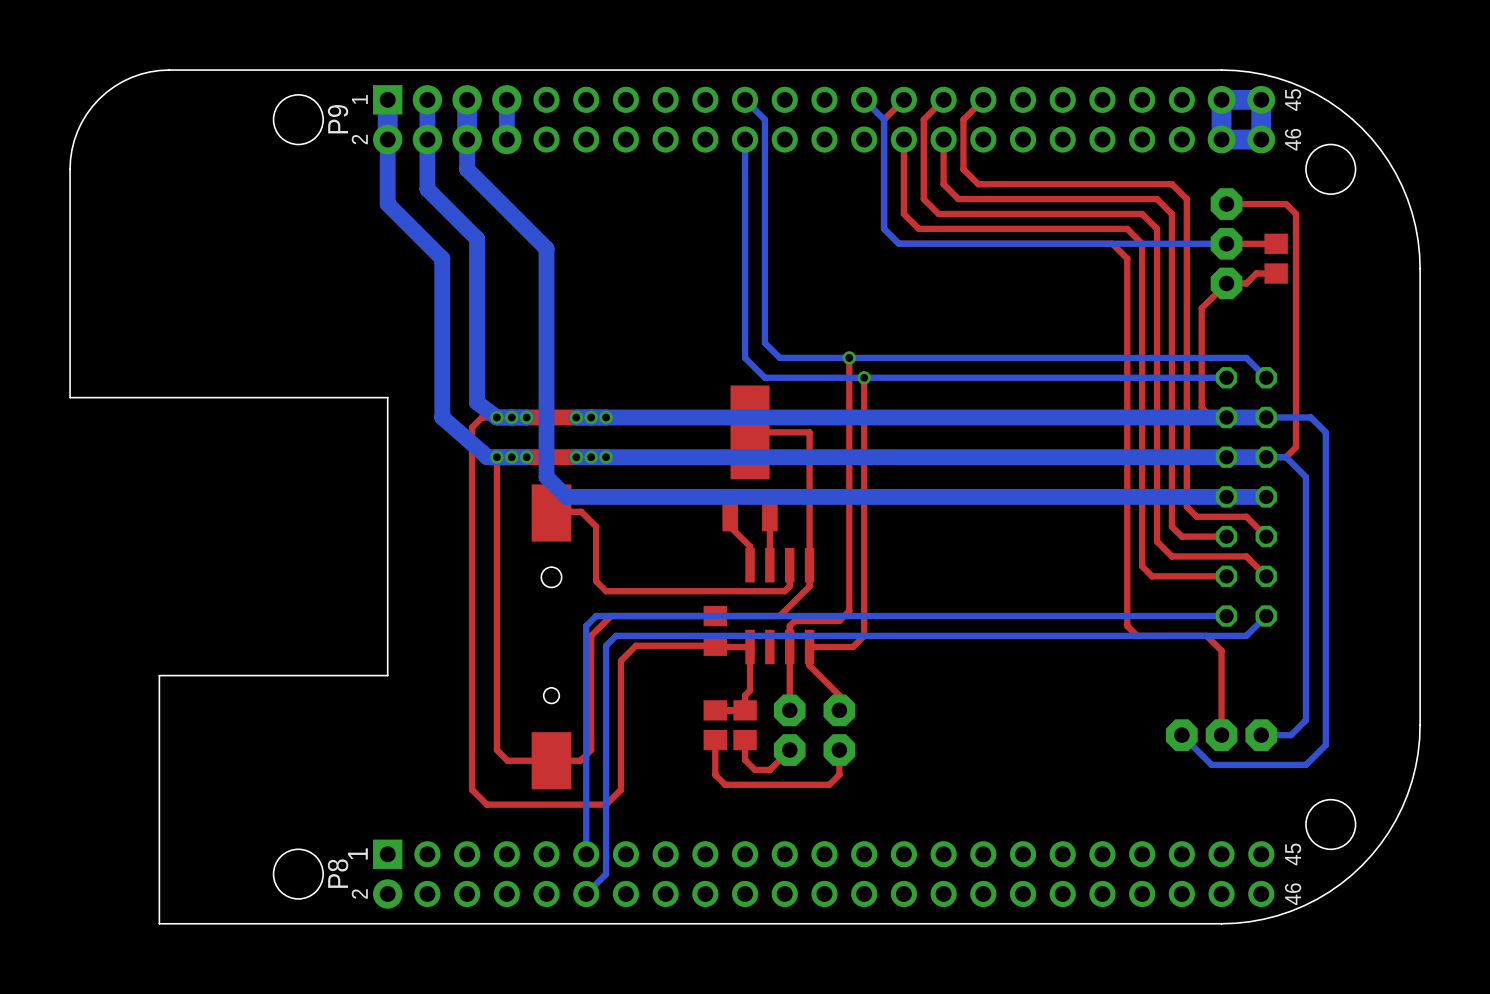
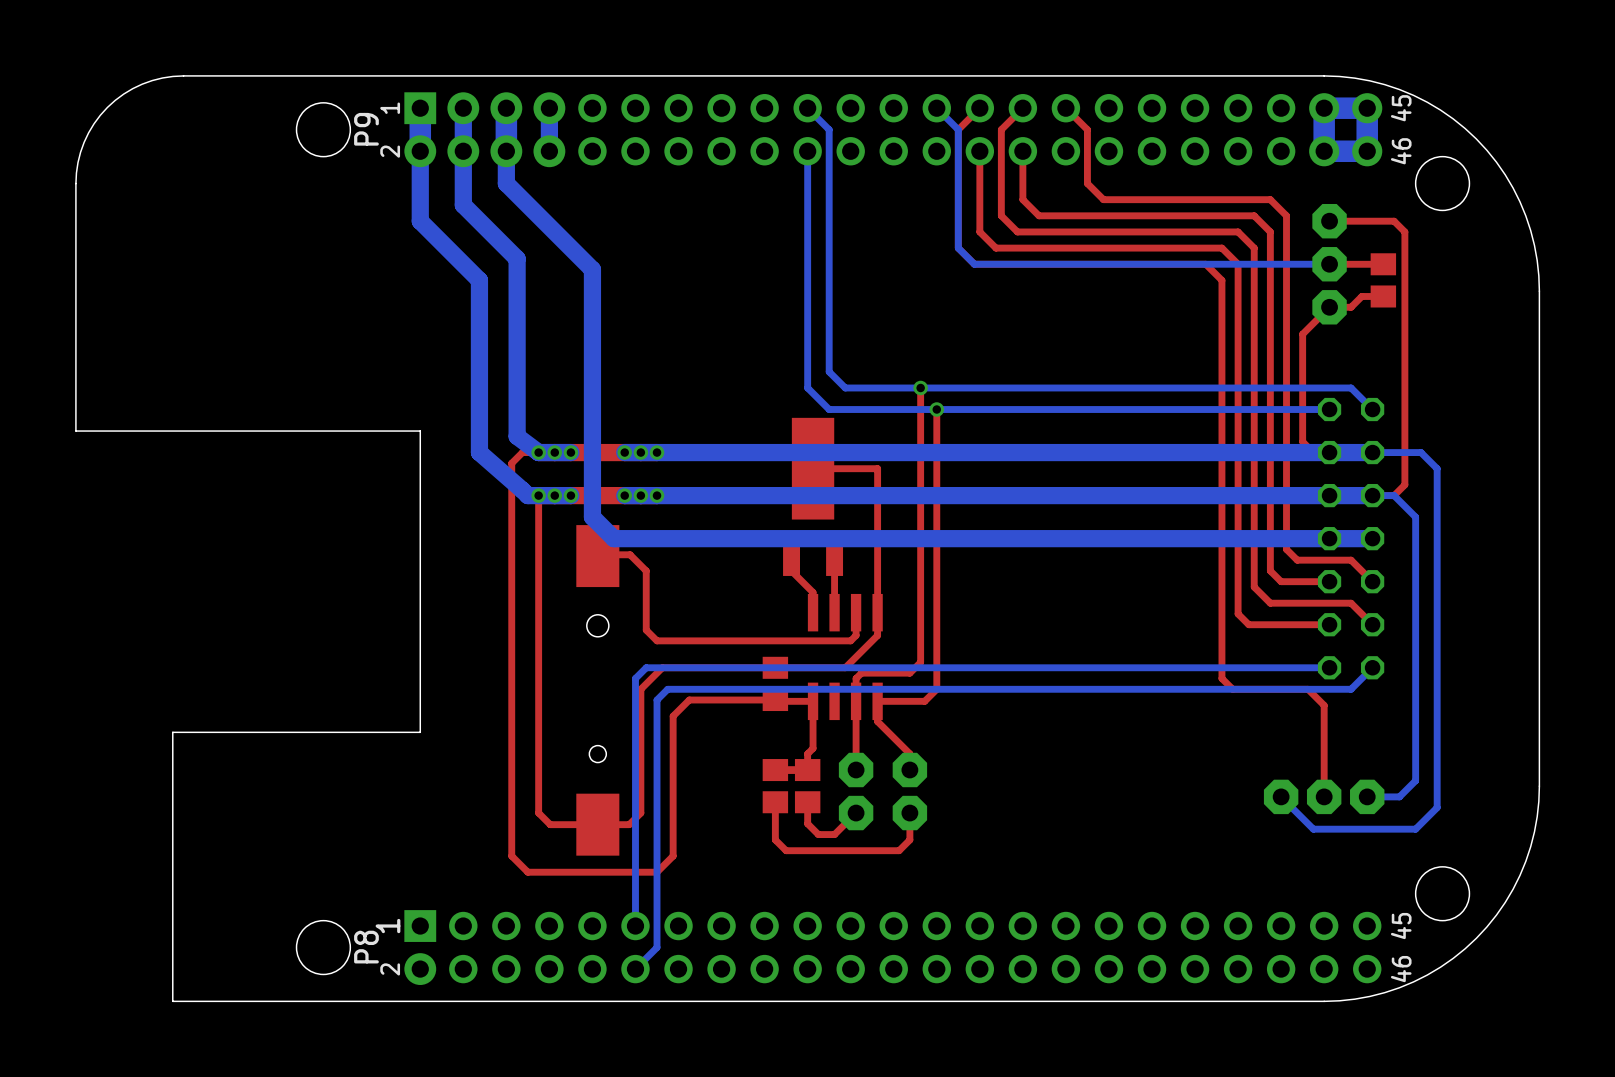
top track: (983, 99) (963, 119) (963, 169) (978, 184) (1018, 184) -> (1065, 108) (1087, 129) (1087, 183) (1103, 199)

